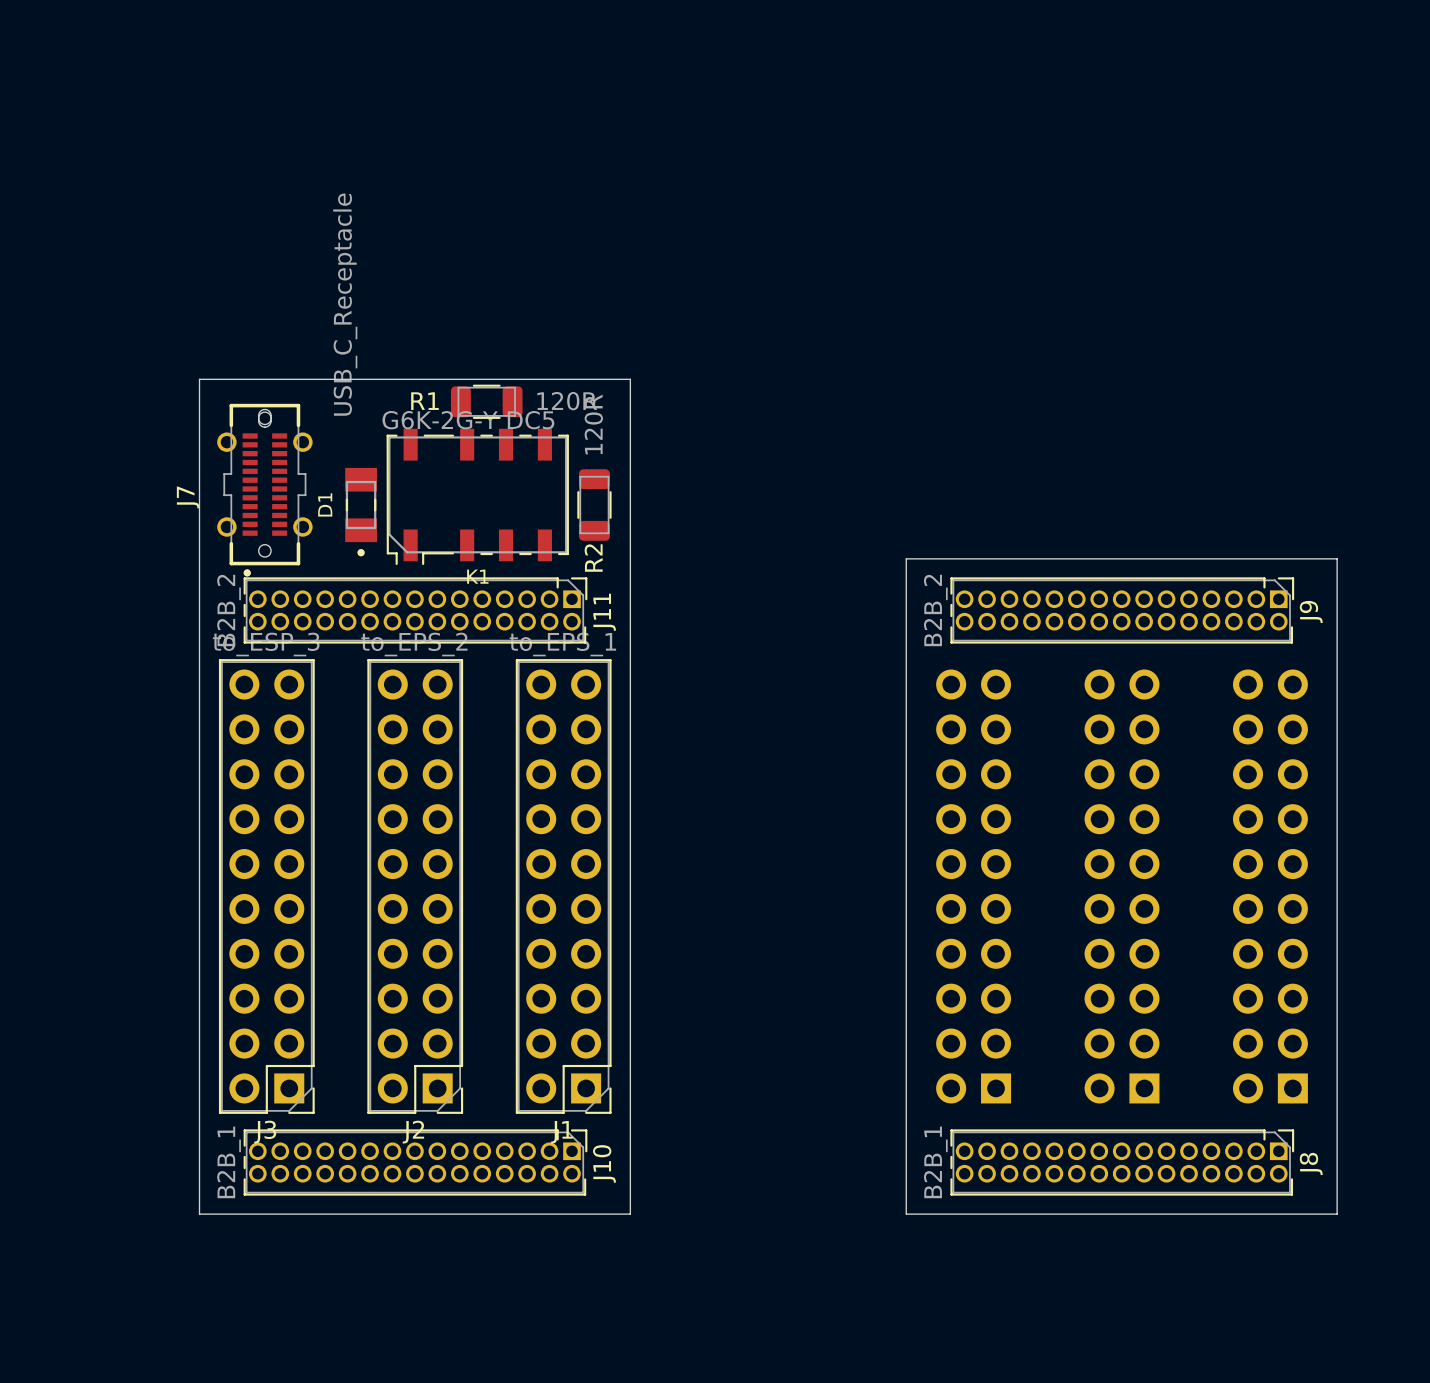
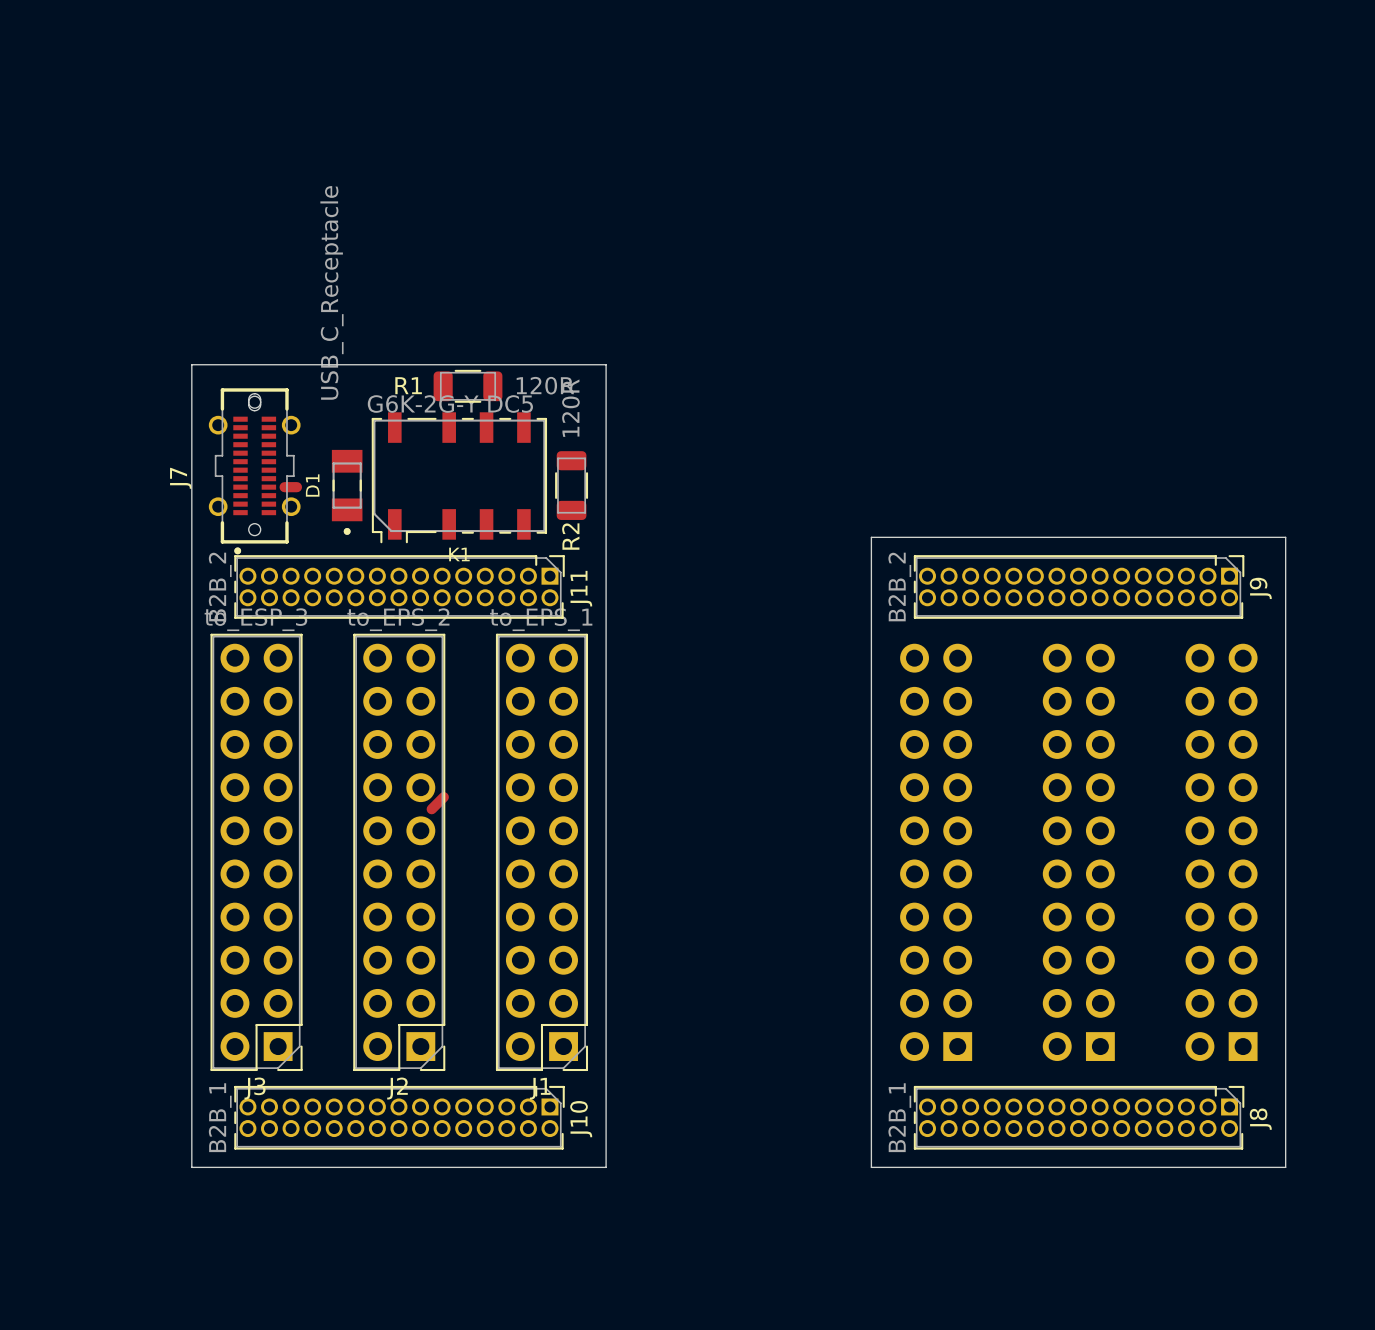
track: none -> (284, 487) (296, 487)
track: none -> (443, 797) (431, 809)

